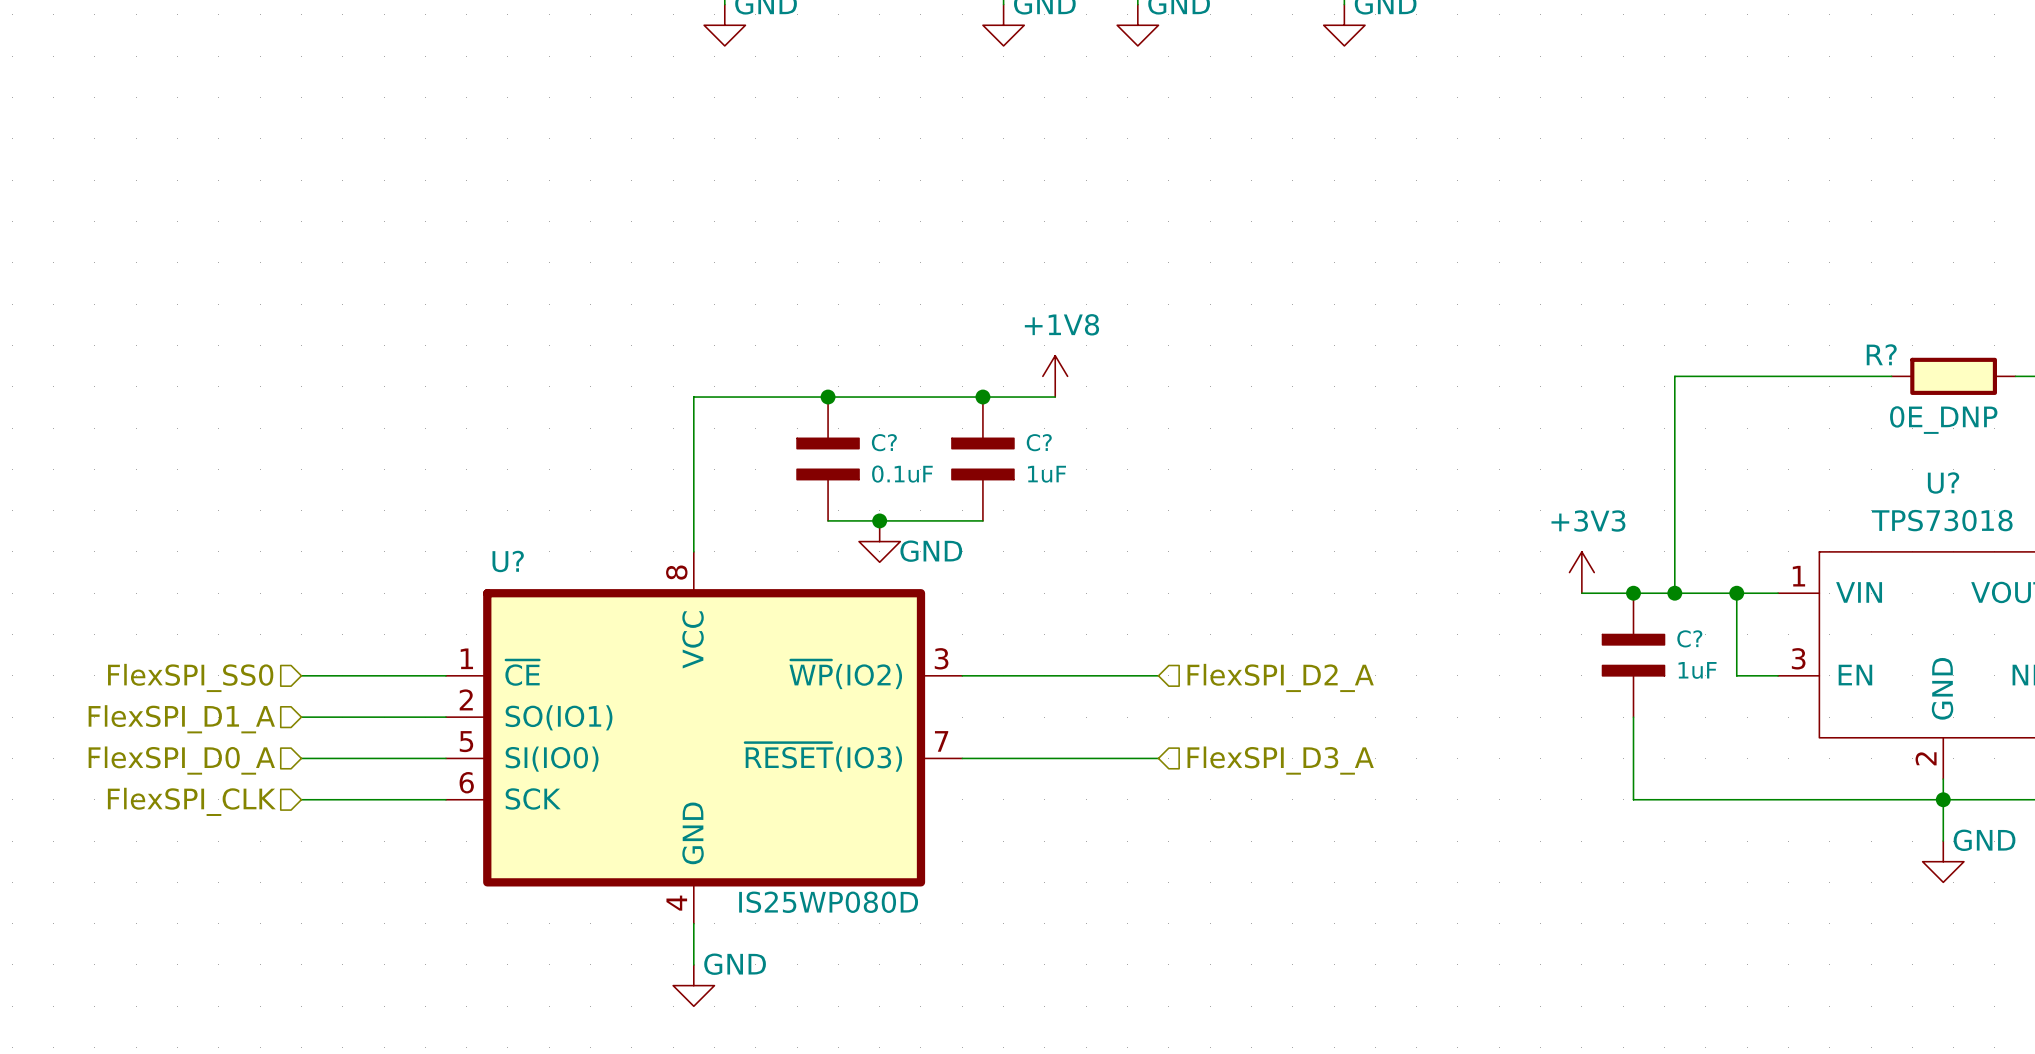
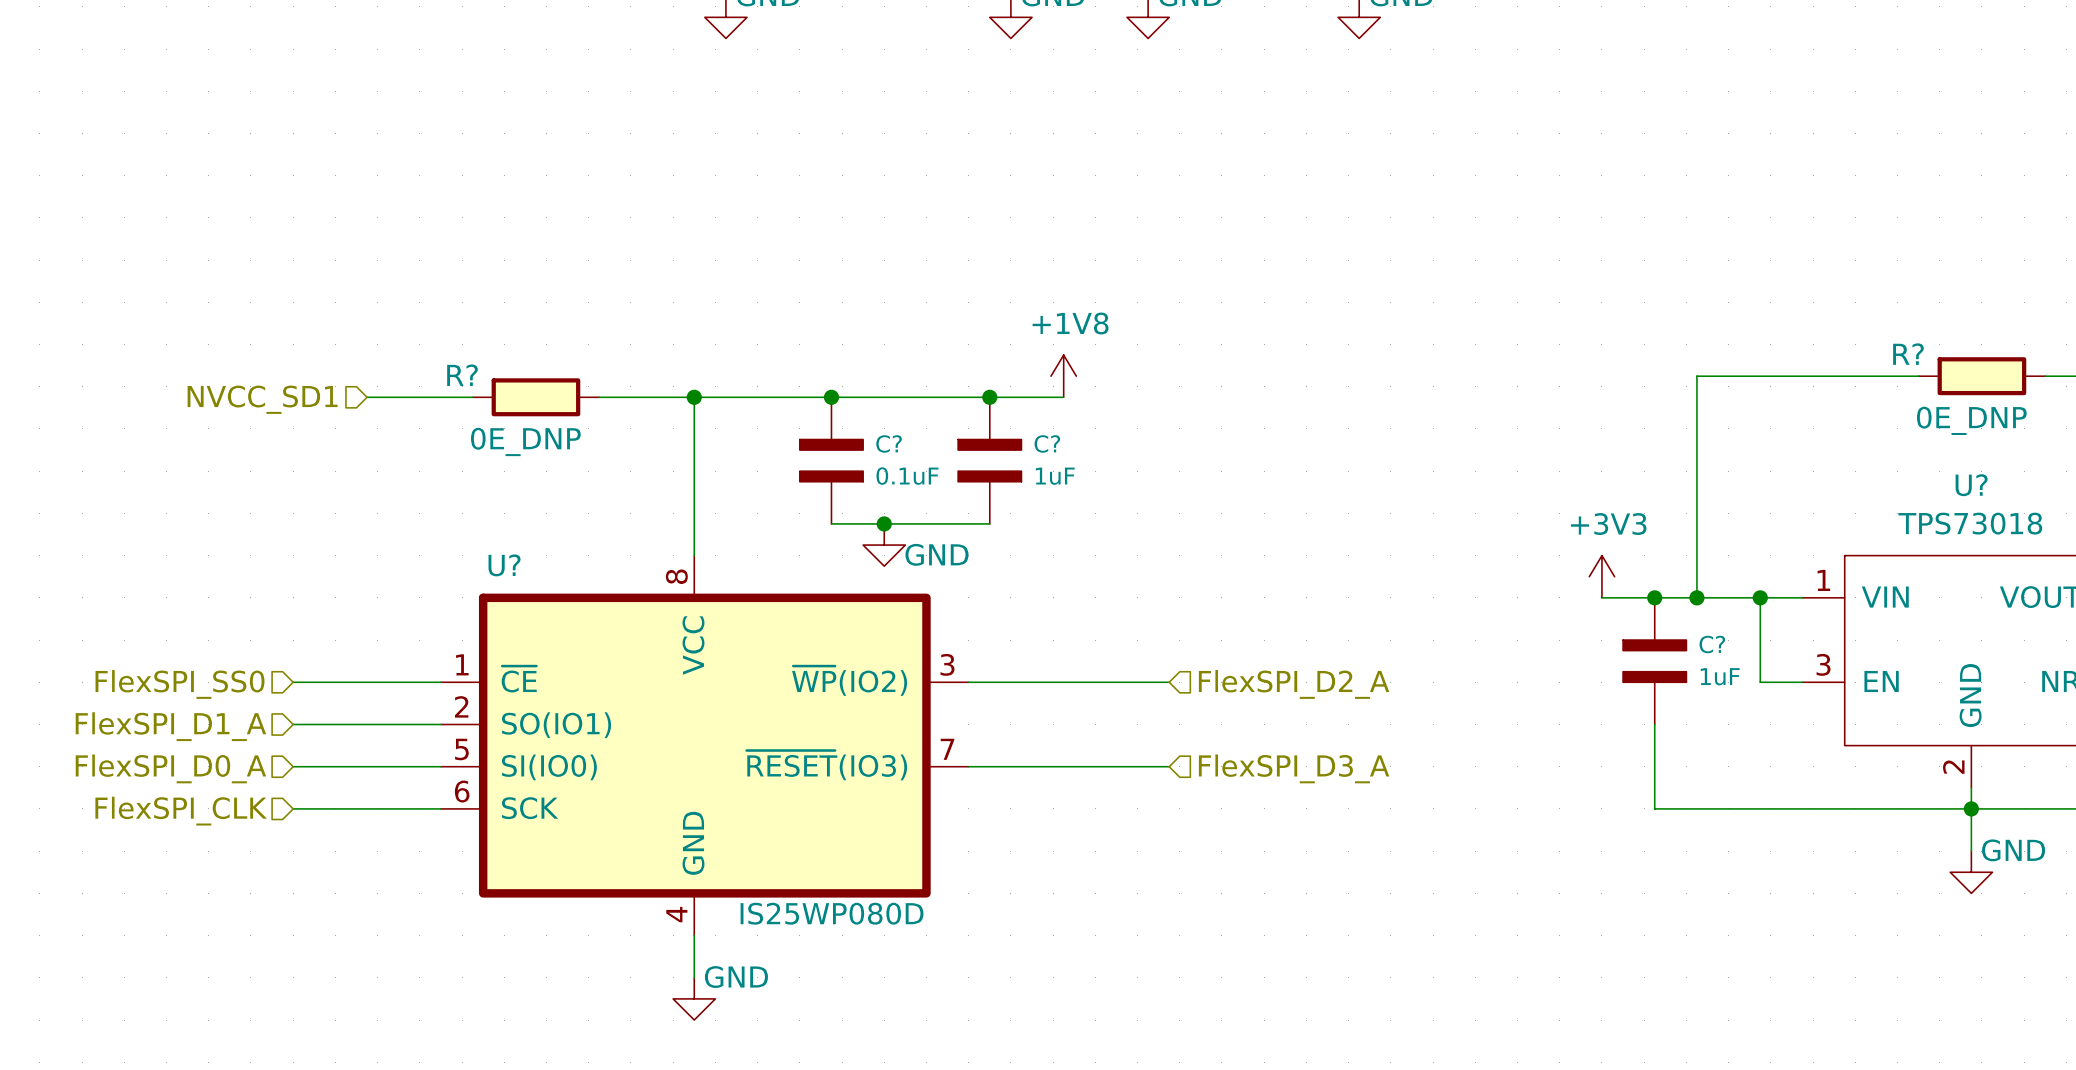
wire: none -> (367, 397) (472, 397)
R?: none -> 0E_DNP (535, 397)
wire: none -> (599, 397) (694, 397)
junction: none -> (694, 397)
hierarchical label: none -> NVCC_SD1 (262, 399)

